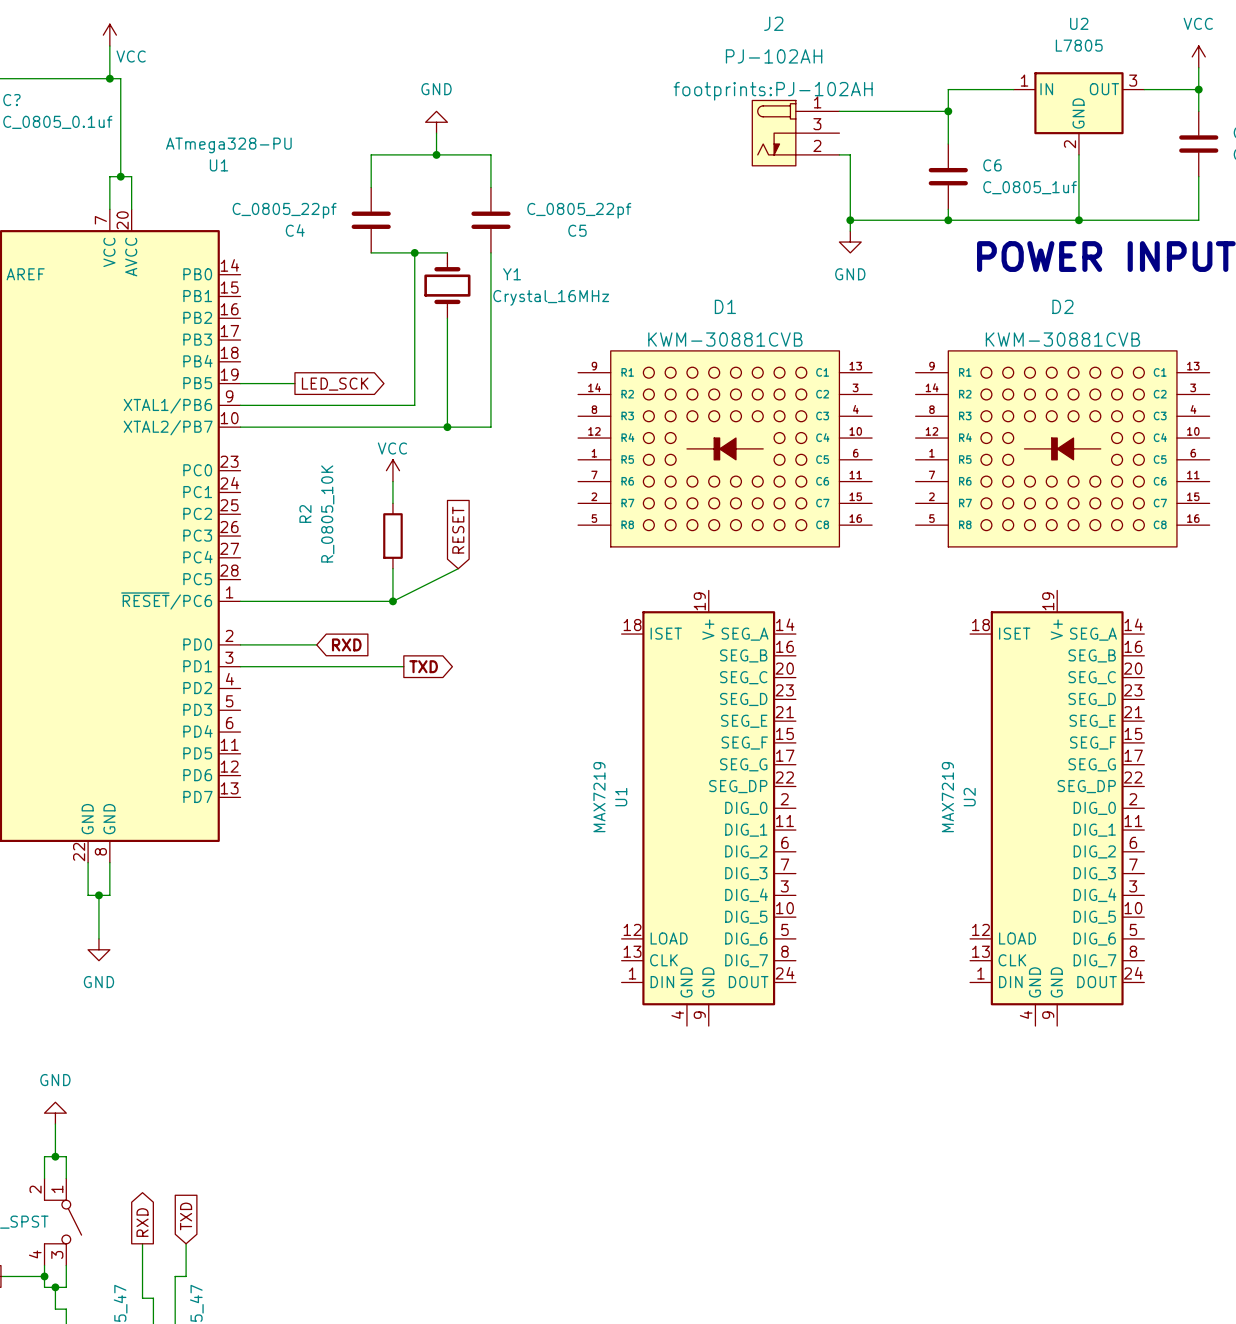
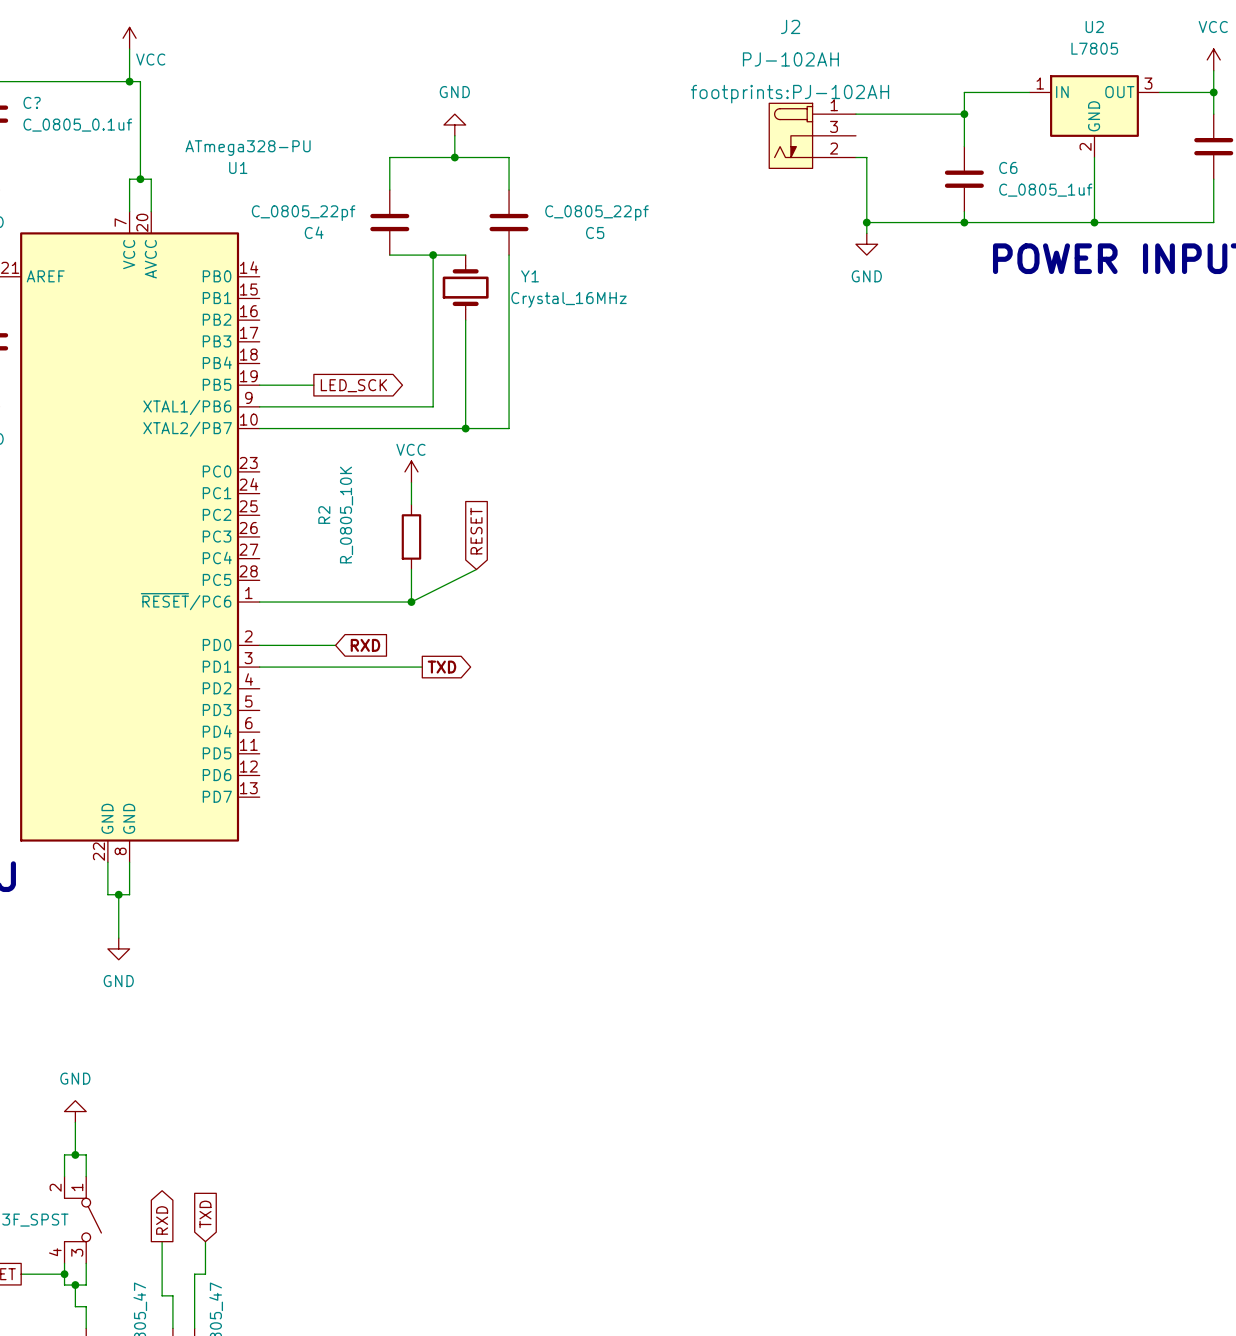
D1: KWM-30881CVB (725, 448) -> none
D2: KWM-30881CVB (1062, 448) -> none
U1: MAX7219 (708, 808) -> none
U2: MAX7219 (1057, 808) -> none

